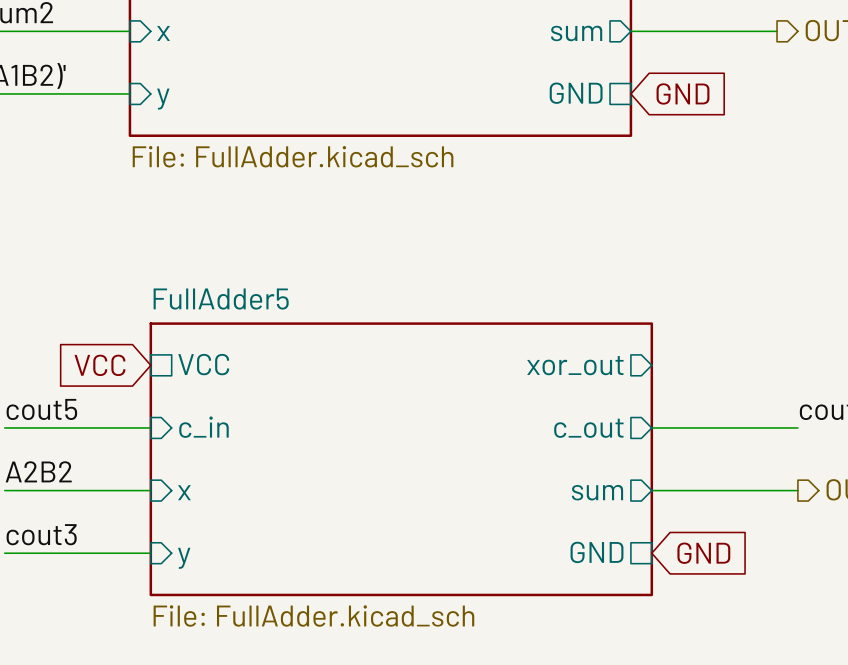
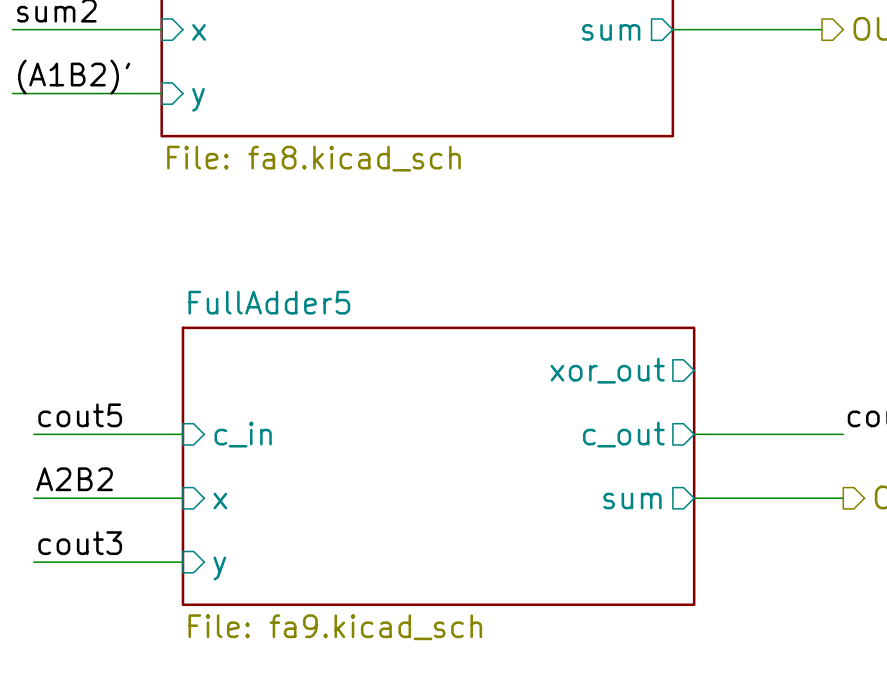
sheet pin: GND (576, 93) -> none
global label: GND (682, 93) -> none
sheet value: File: FullAdder.kicad_sch (293, 156) -> File: fa8.kicad_sch (313, 158)
sheet pin: VCC (203, 364) -> none
global label: VCC (99, 365) -> none
sheet pin: GND (597, 552) -> none
global label: GND (703, 553) -> none
sheet FullAdder5 value: File: FullAdder.kicad_sch (313, 615) -> File: fa9.kicad_sch (335, 627)

